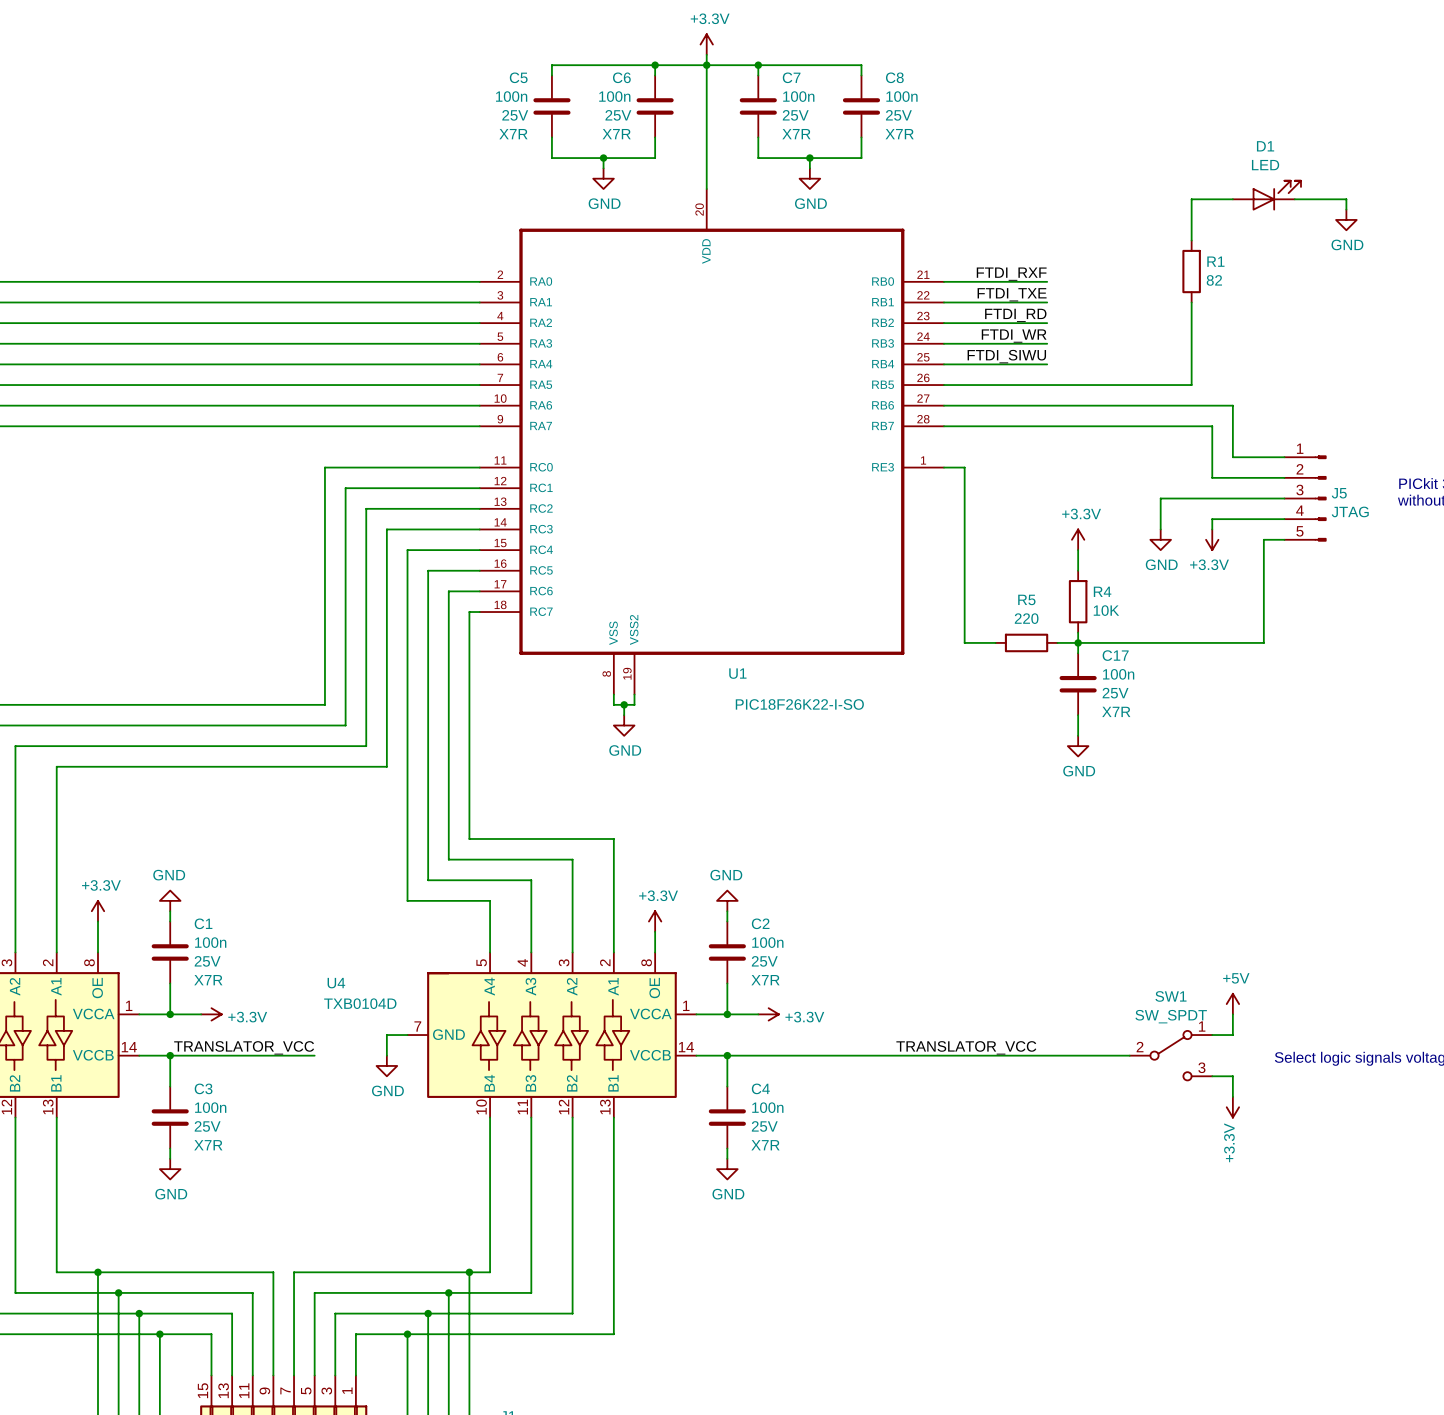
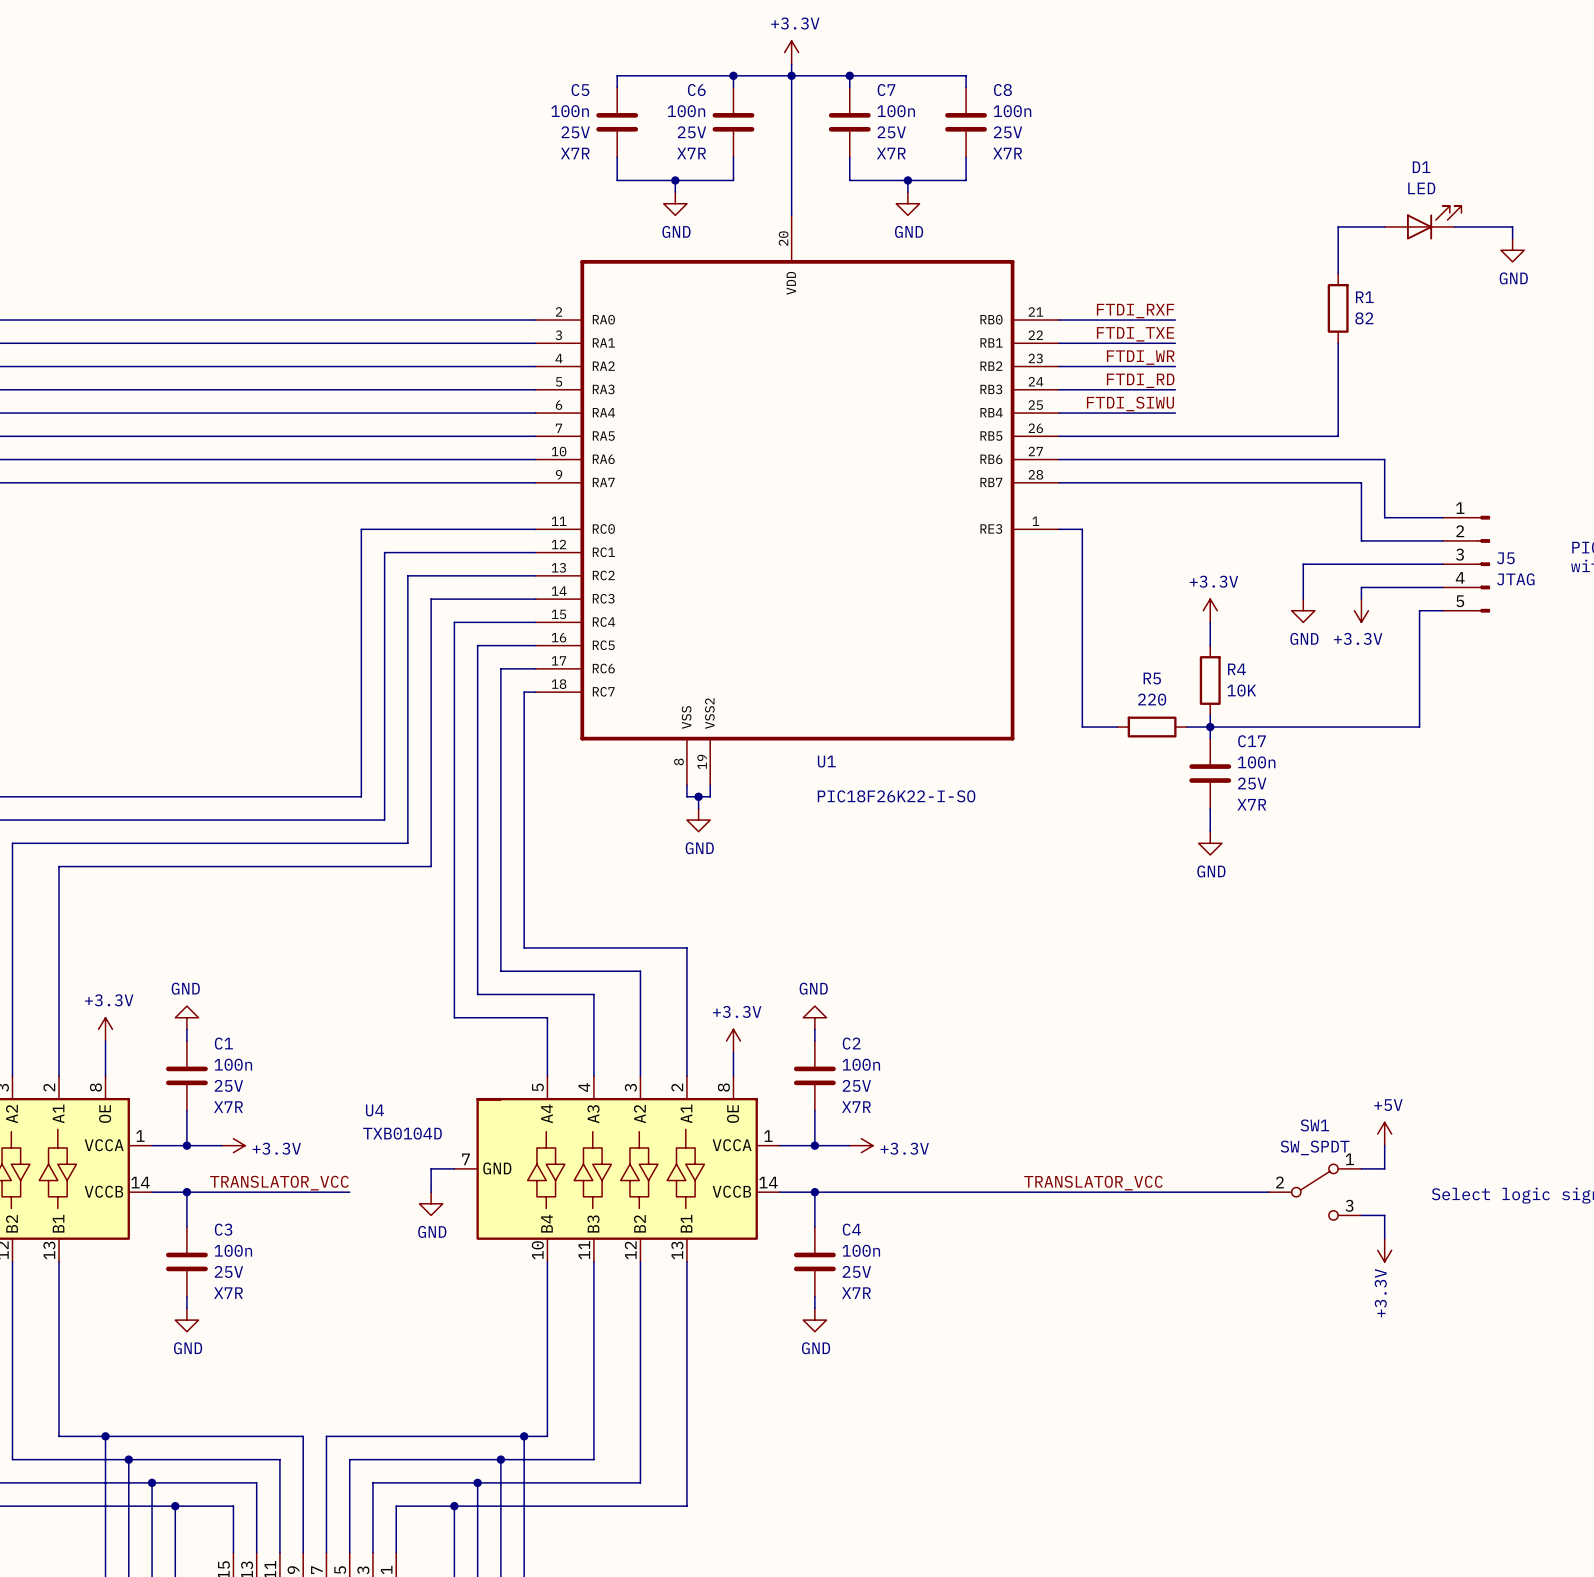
label: FTDI_RD (1015, 315) -> FTDI_WR (1140, 357)
label: FTDI_WR (1014, 336) -> FTDI_RD (1140, 380)

